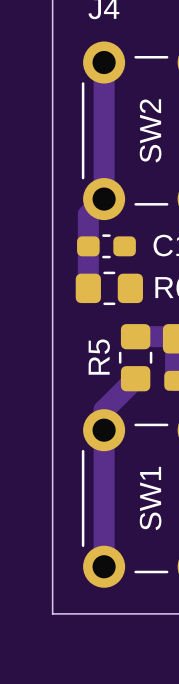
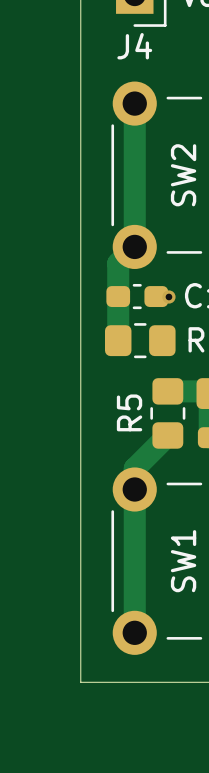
via: none -> (168, 296)

